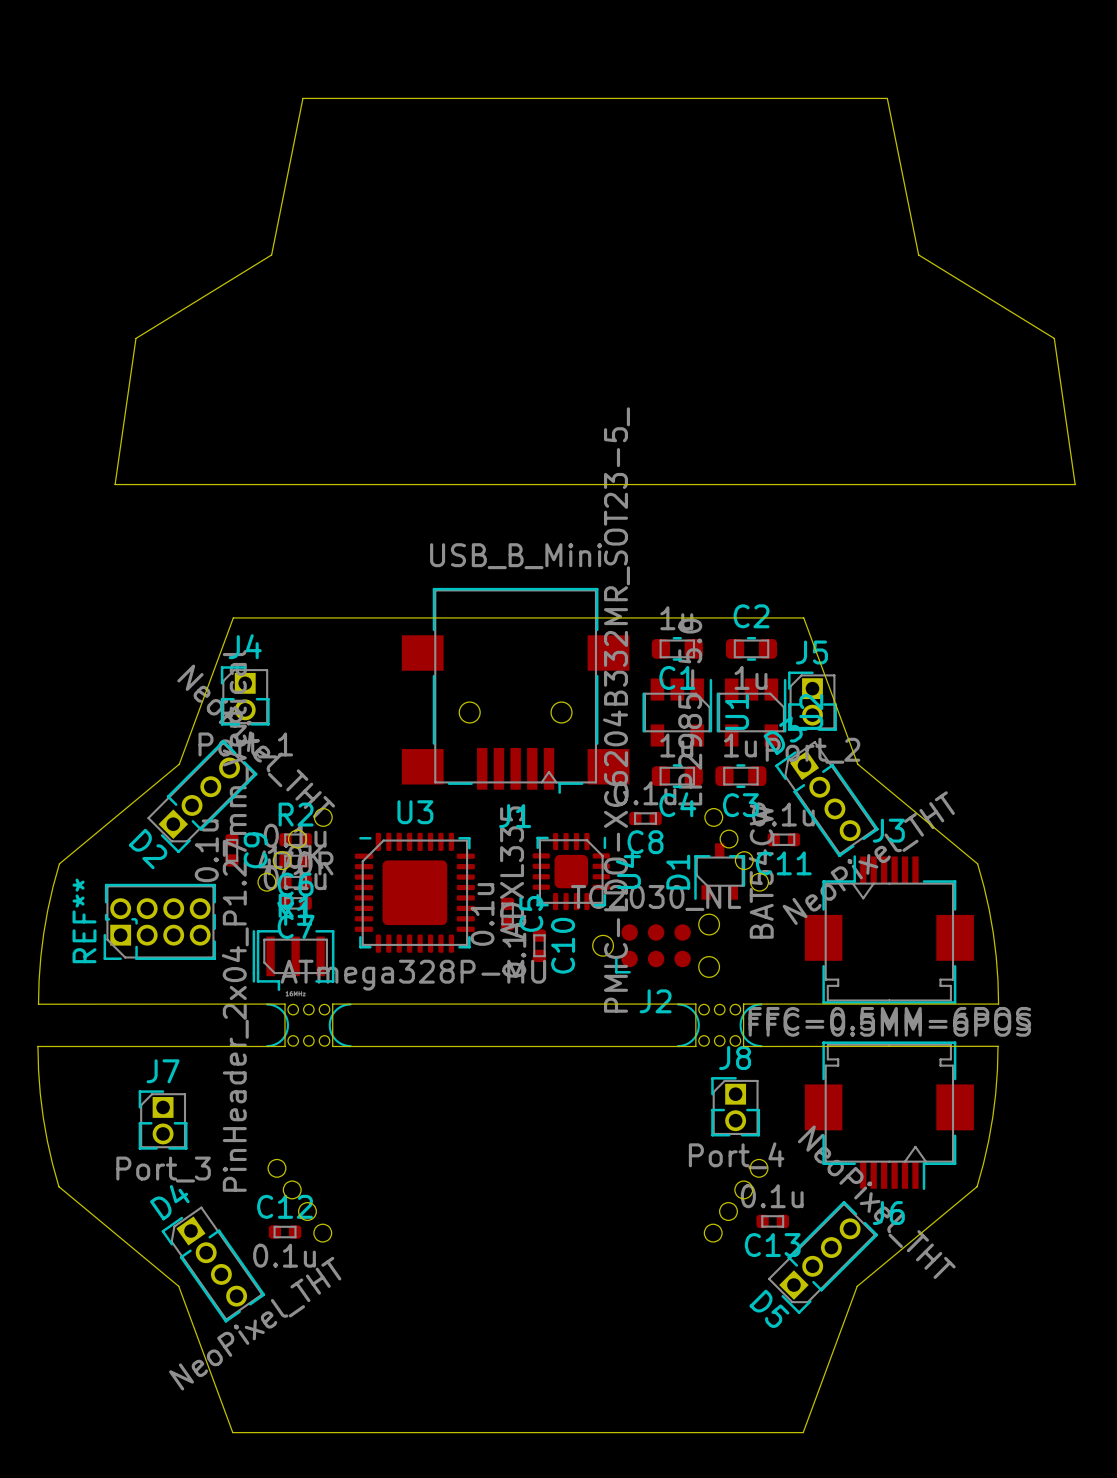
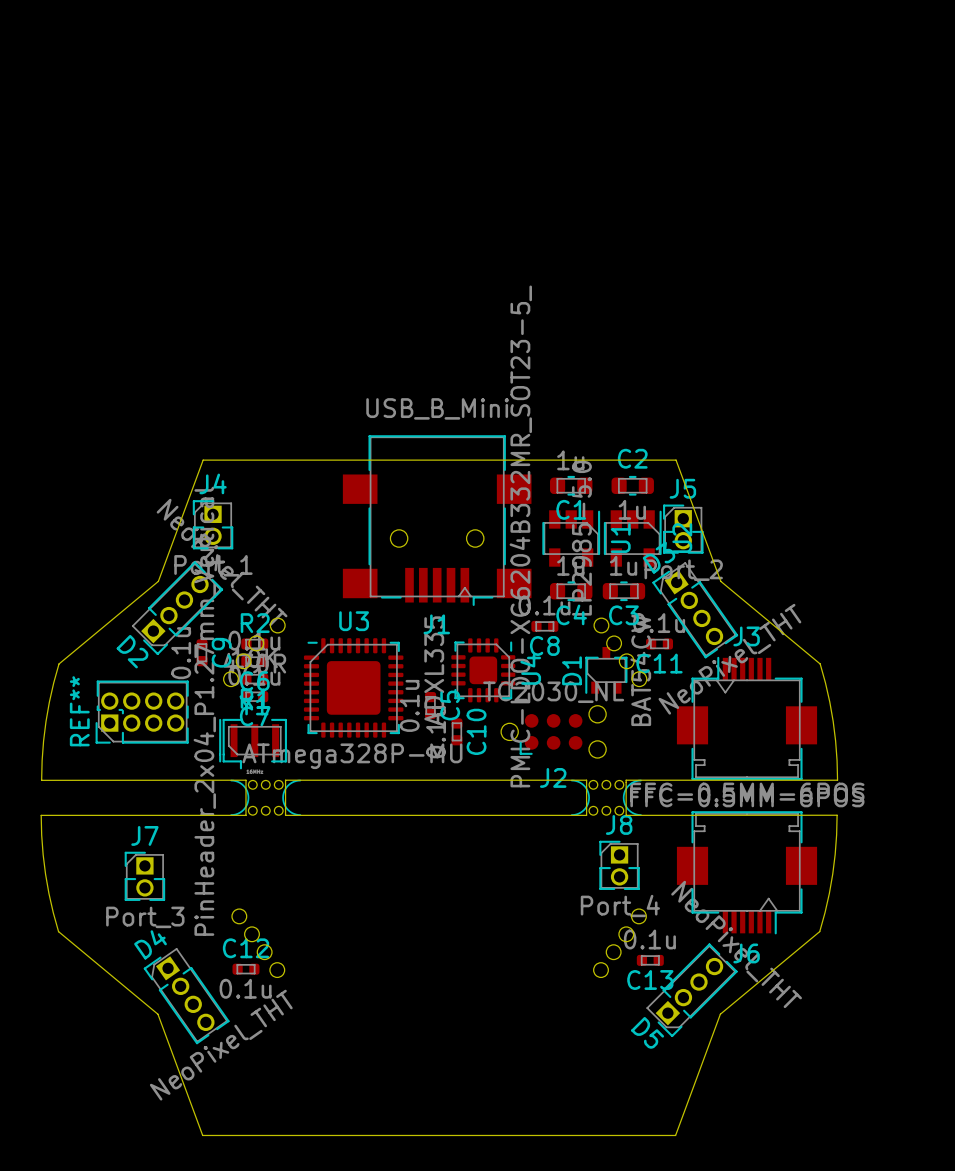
board edge: (302, 98) (887, 98) (918, 254) (1054, 338) (1075, 484) (115, 484) (135, 338) (271, 254) (302, 98) -> none

